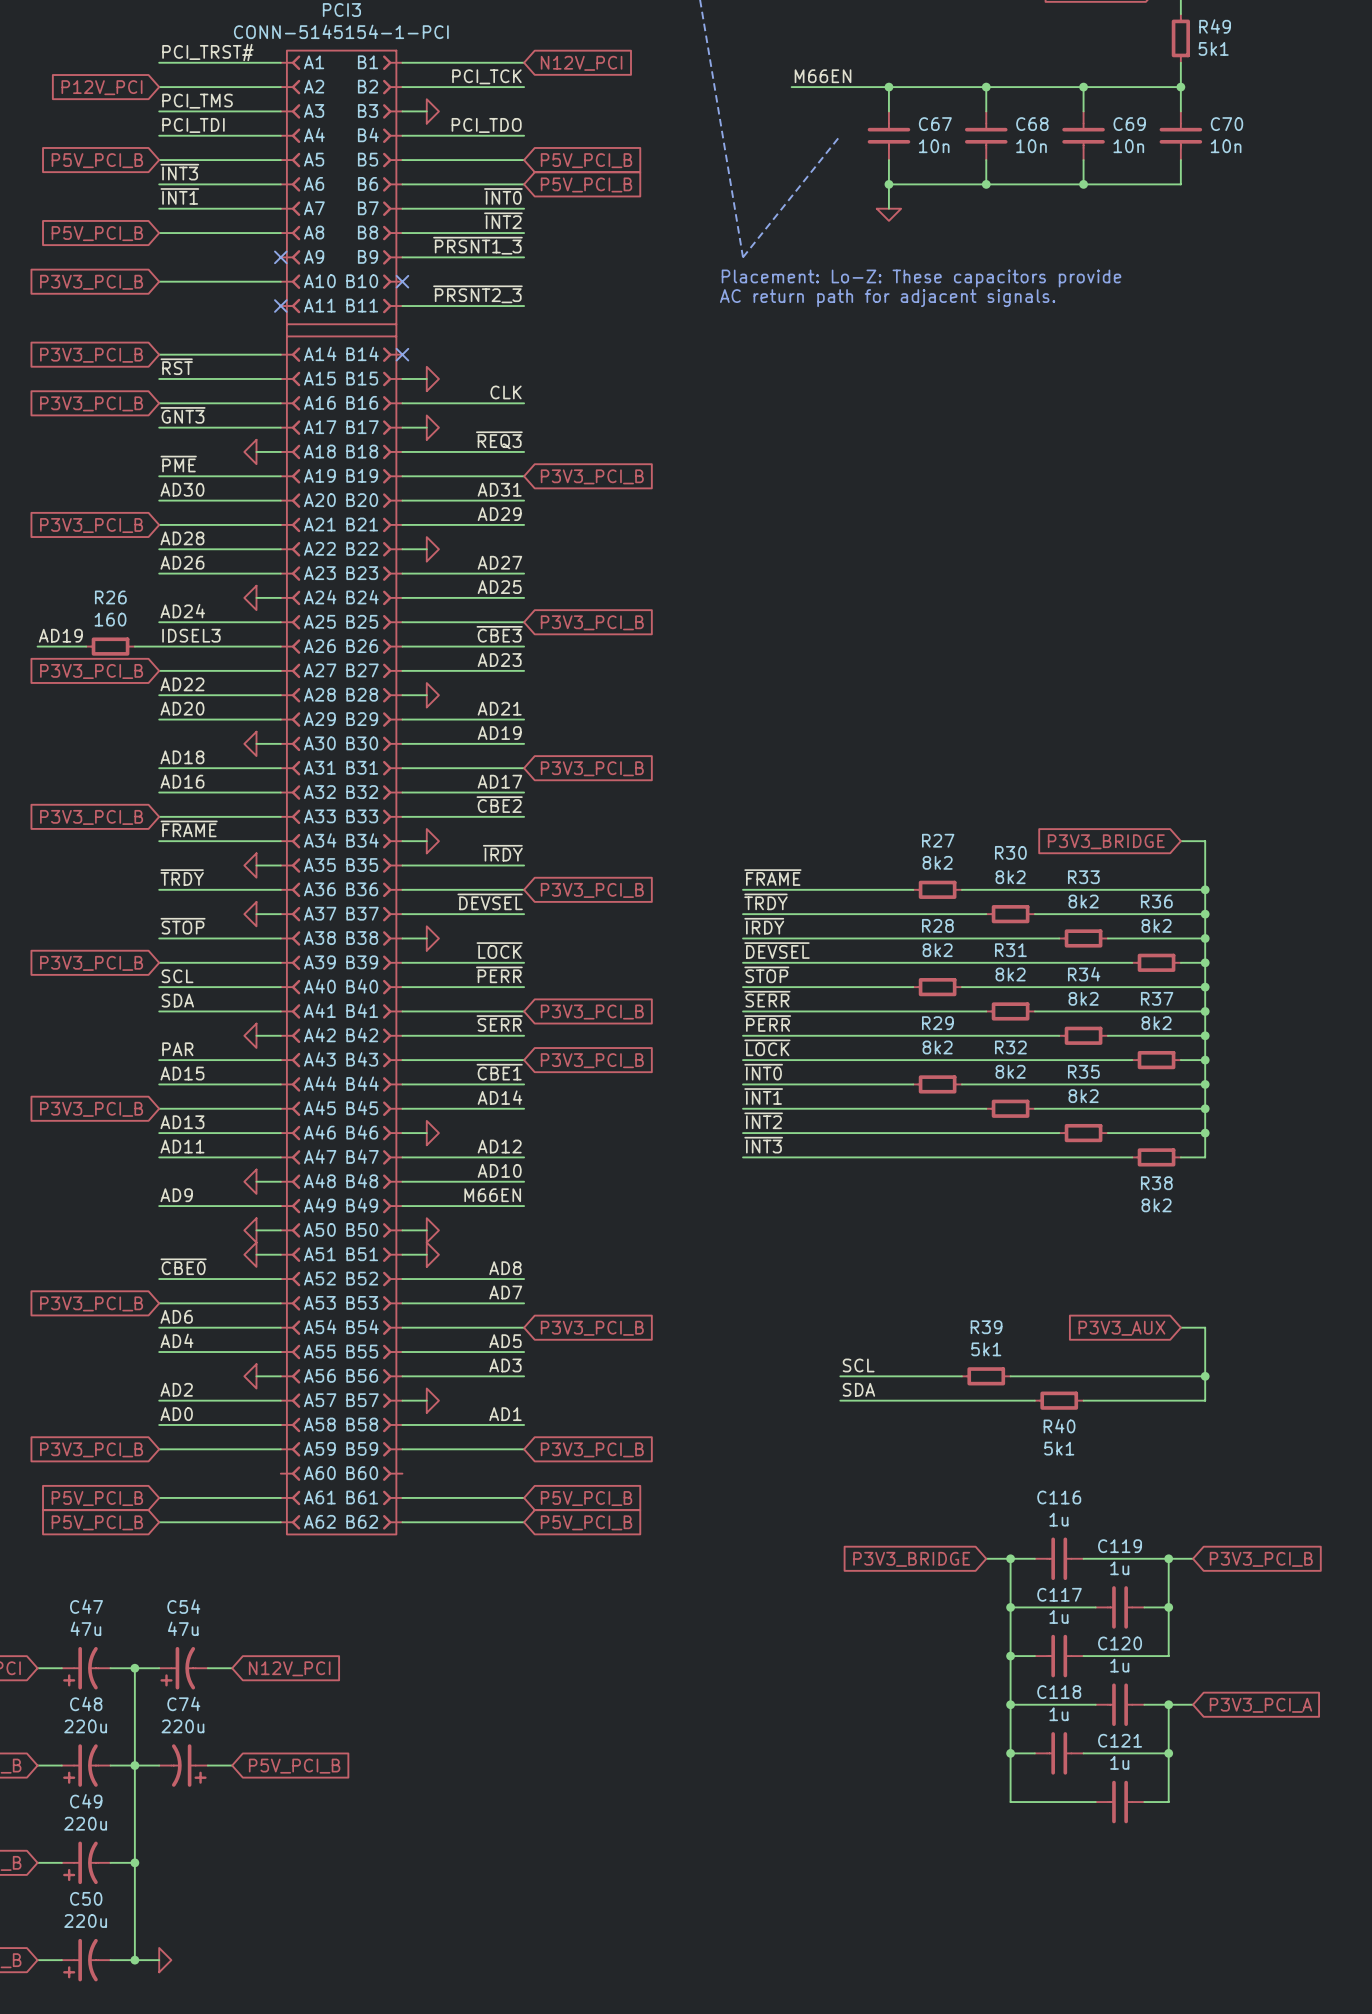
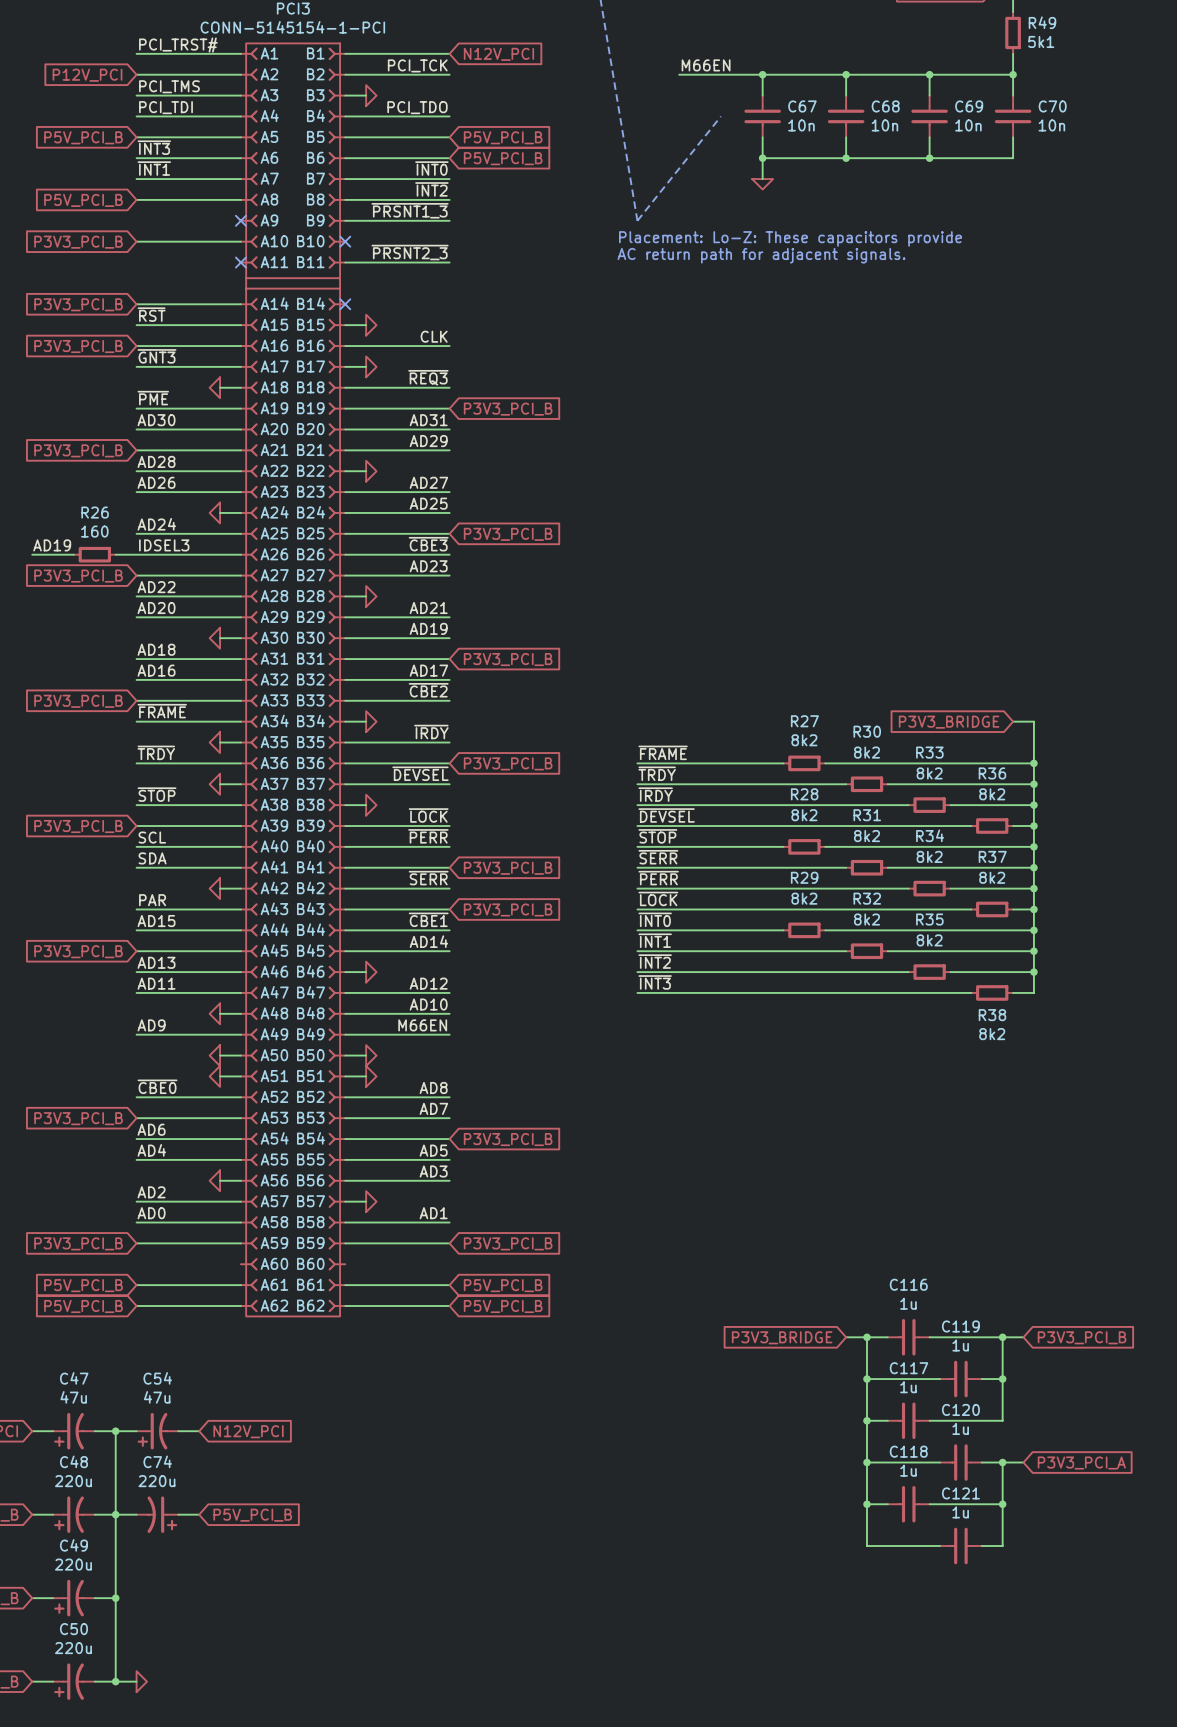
wire: (1180, 1327) (1205, 1327) (1205, 1400) (1083, 1400) -> none
global label: P3V3_AUX (1121, 1328) -> none
label: SCL (858, 1365) -> none
wire: (840, 1376) (961, 1376) -> none
R39: 5k1 (986, 1376) -> none
wire: (1010, 1376) (1205, 1376) -> none
junction: (1205, 1376) -> none
label: SDA (858, 1389) -> none
wire: (840, 1400) (1034, 1400) -> none
R40: 5k1 (1059, 1400) -> none

